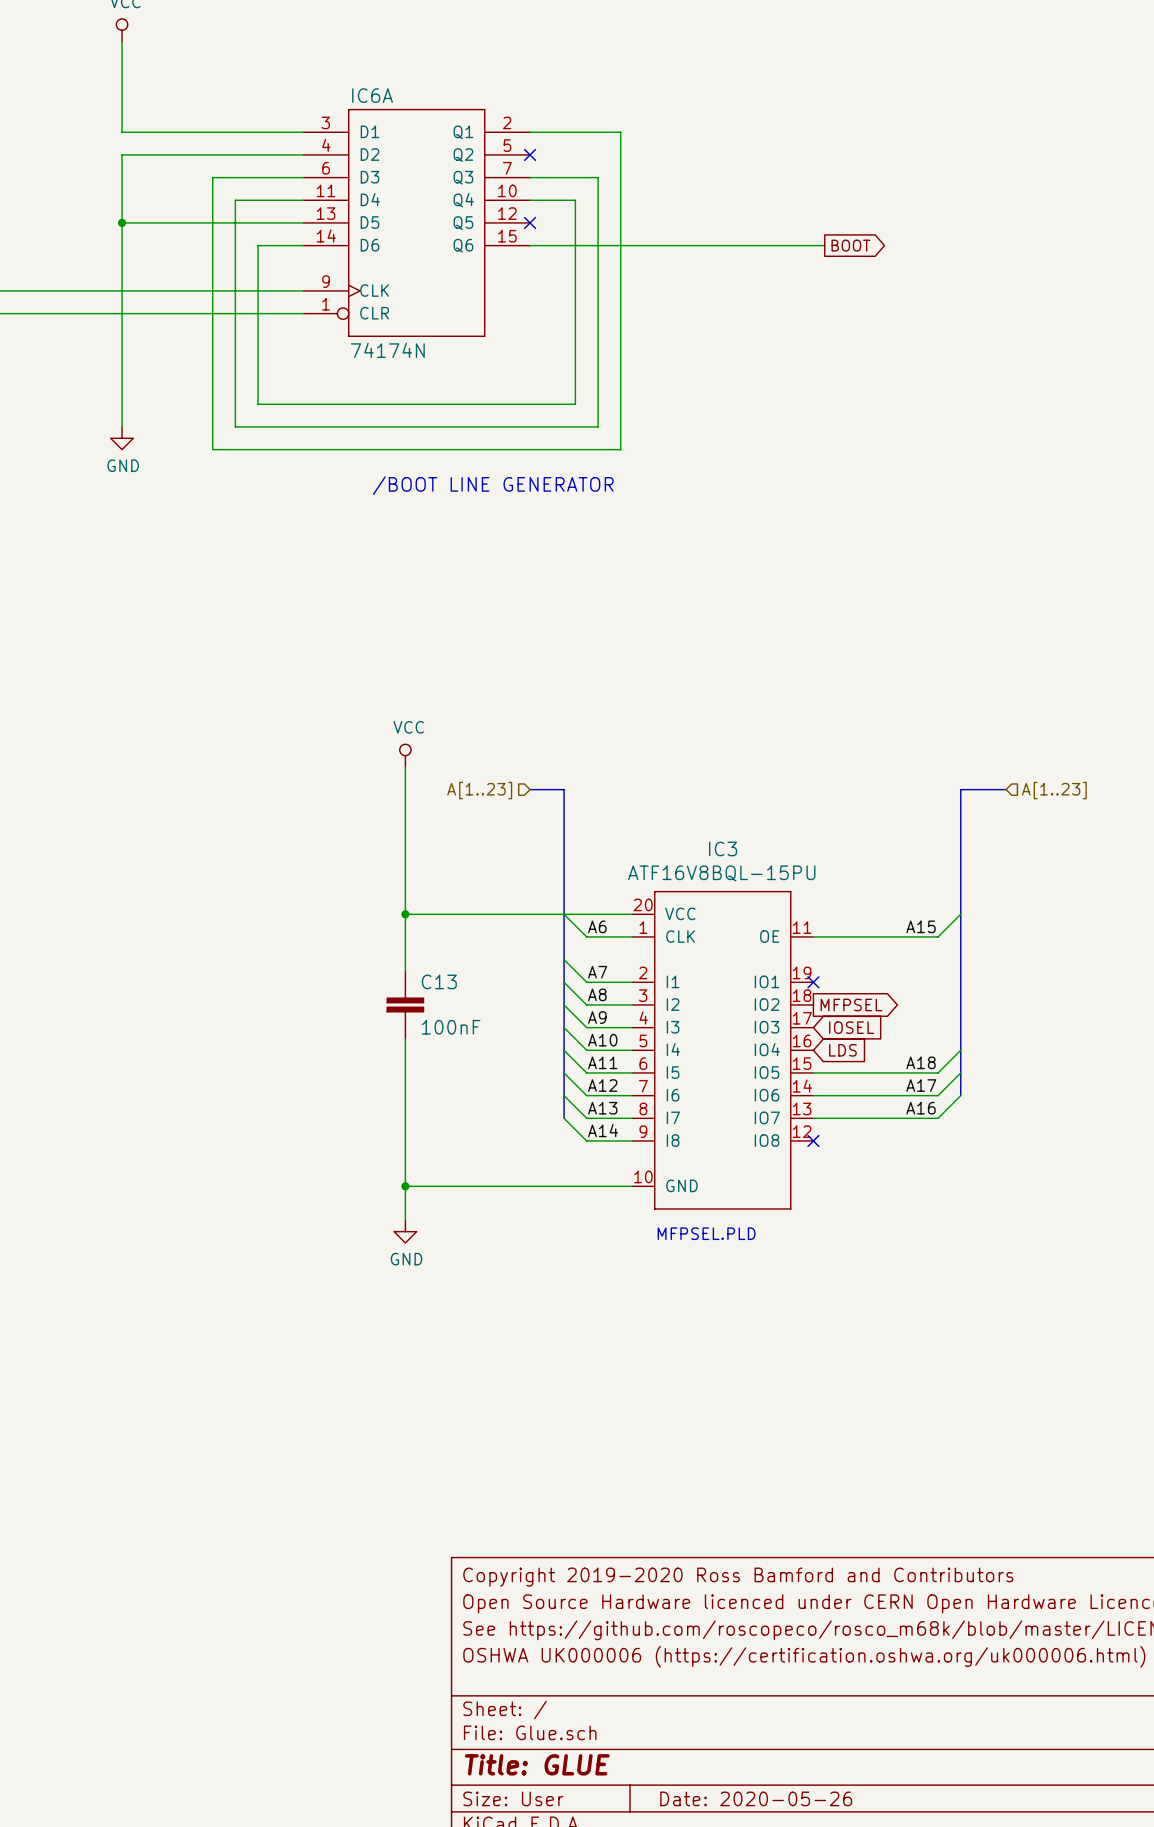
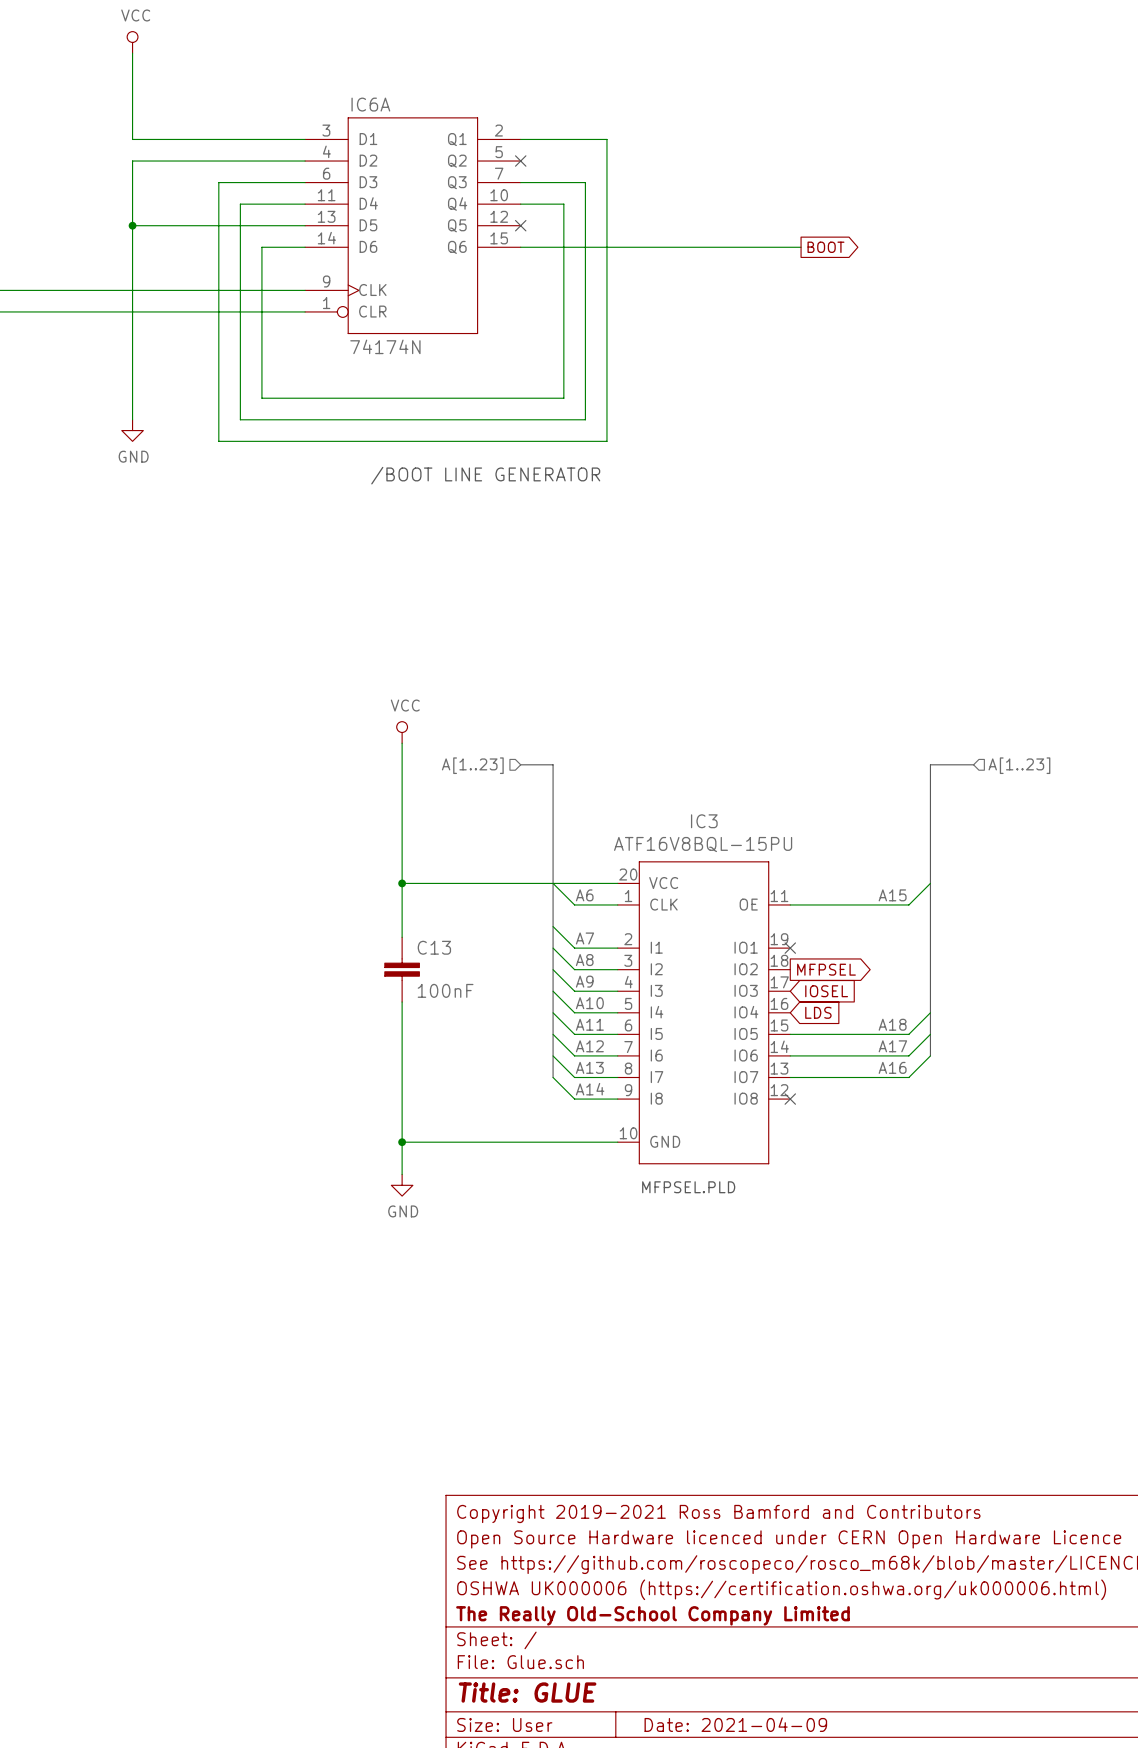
title block: Copyright 2019-2020 Ross Bamford and Contributors (738, 1577) -> Copyright 2019-2021 Ross Bamford and Contributors (718, 1513)
title block: none -> The Really Old-School Company Limited (652, 1615)
title block: Date: 2020-05-26 (756, 1798) -> Date: 2021-04-09 (735, 1724)

